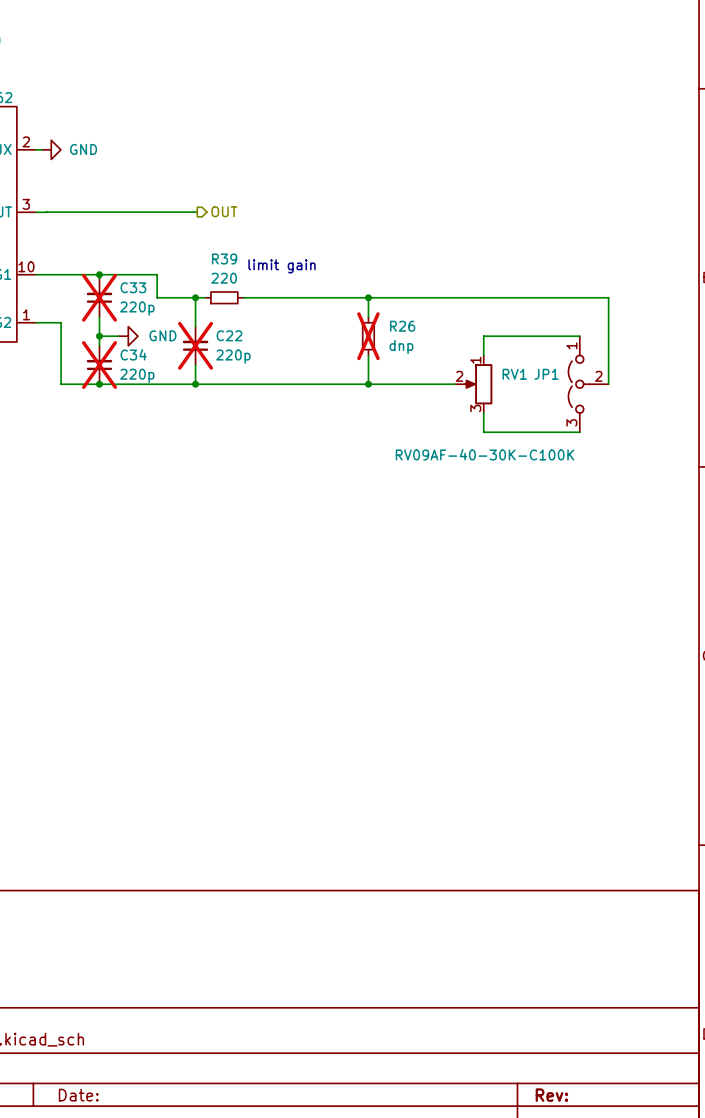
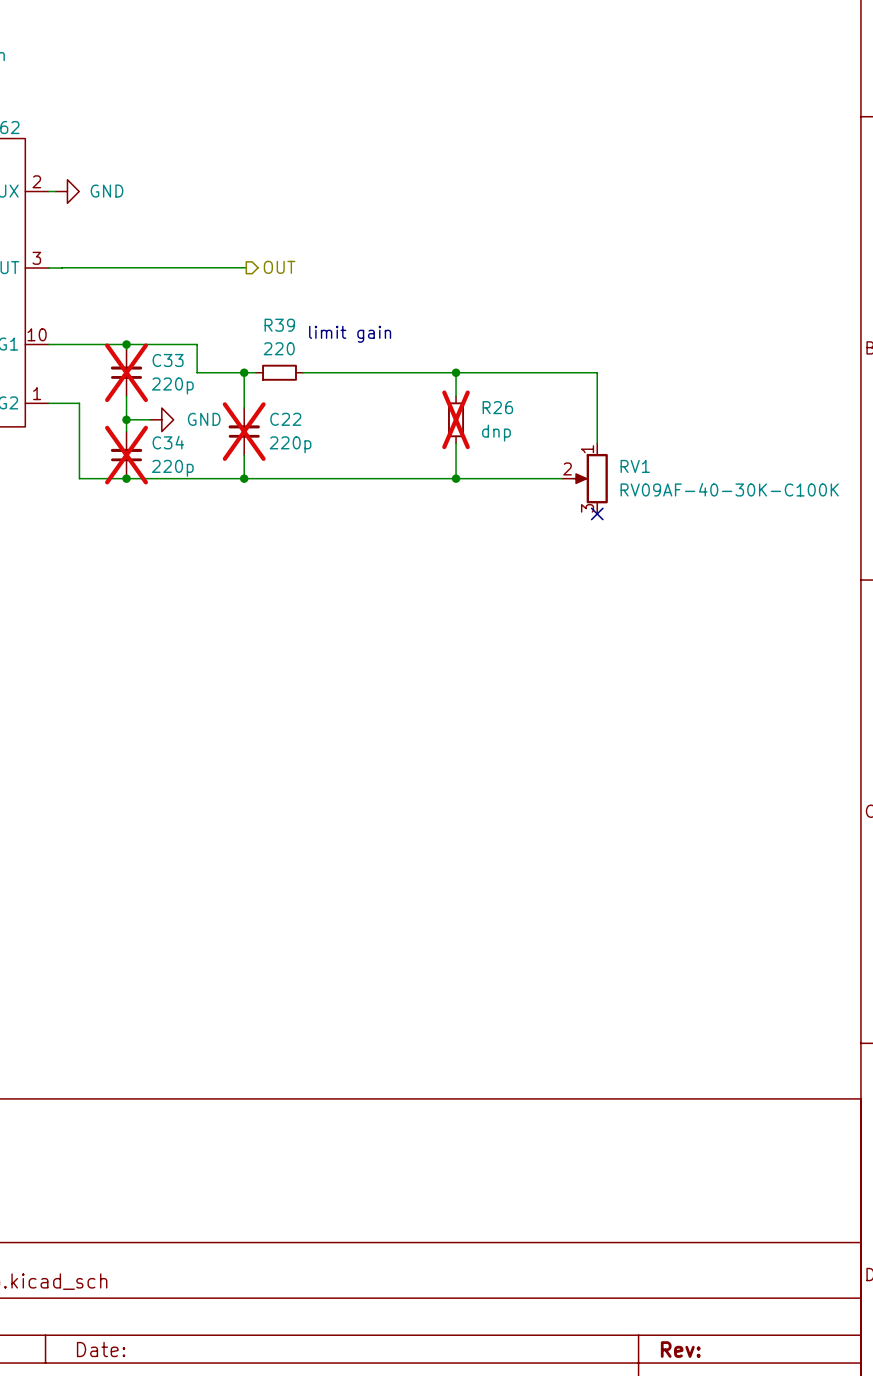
wire: (483, 297) (608, 297) (608, 384) -> none
wire: (483, 336) (579, 336) -> (597, 419) (597, 372)
JP1: (588, 384) -> none
wire: (483, 413) (483, 432) (579, 432) -> none
no-connect mark: none -> (597, 513)
RV1 value position: RV09AF-40-30K-C100K (485, 454) -> RV09AF-40-30K-C100K (729, 489)

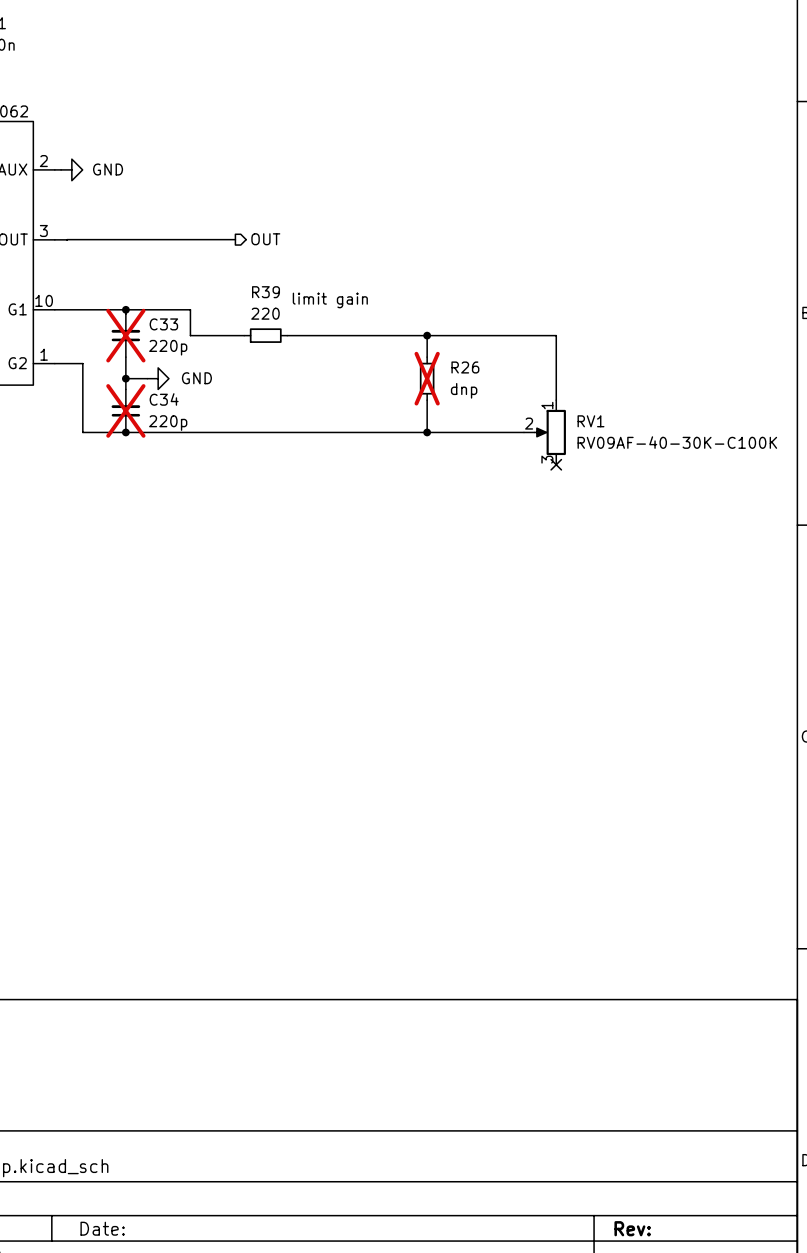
wire: (244, 372) (244, 408) -> none
junction: (244, 372) -> none
C22: 220p (244, 431) -> none
wire: (244, 455) (244, 478) -> none
junction: (244, 478) -> none

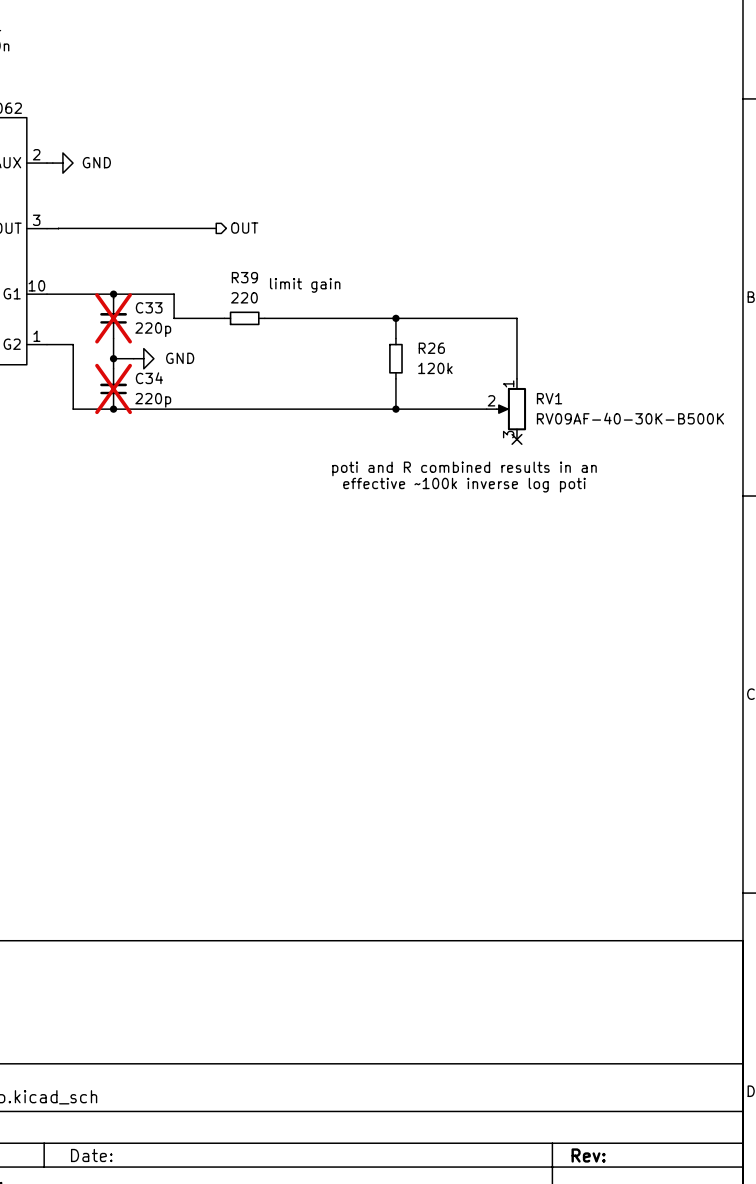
R26 do-not-place cross: (427, 378) -> none
R26 value: dnp (464, 390) -> 120k (435, 368)
RV1 value: RV09AF-40-30K-C100K (677, 442) -> RV09AF-40-30K-B500K (630, 418)
text: none -> poti and R combined results in an (464, 468)
text: none -> effective ~100k inverse log poti (464, 485)

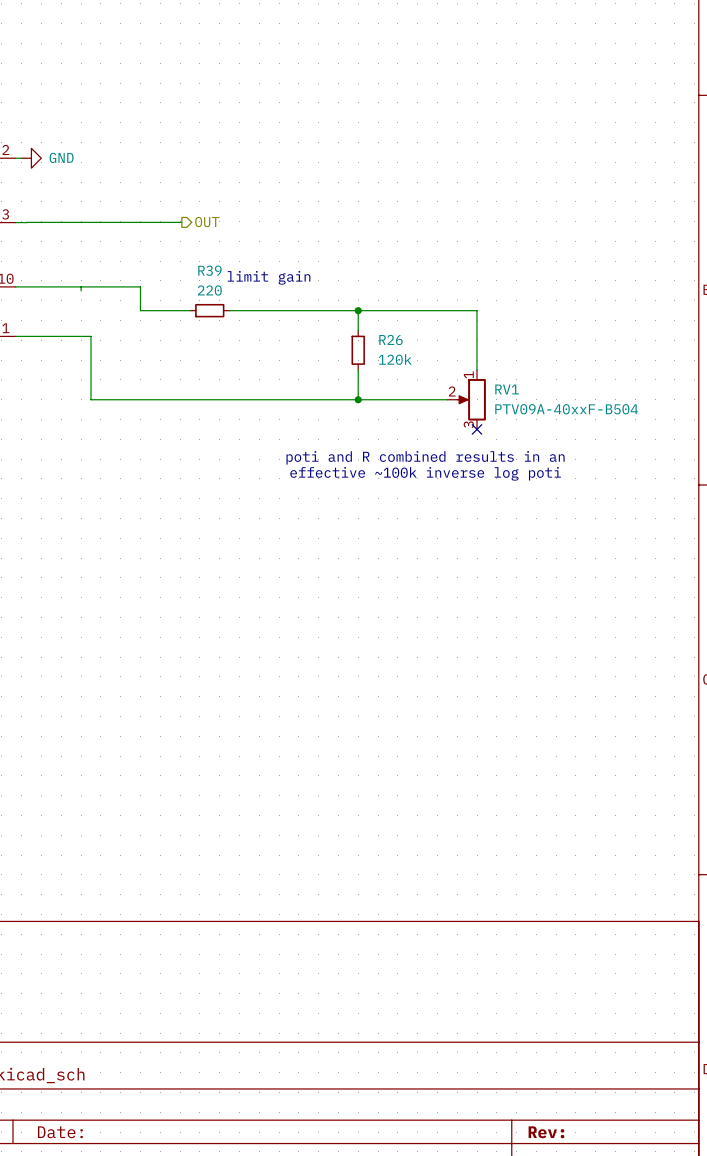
junction: (113, 294) -> none
C33: 220p (113, 318) -> none
wire: (113, 338) (113, 368) -> none
wire: (73, 344) (73, 409) (123, 409) -> (41, 336) (90, 336) (90, 399)
wire: (113, 358) (133, 358) -> none
junction: (113, 358) -> none
power symbol: GND (143, 358) -> none
C34: 220p (113, 388) -> none
junction: (113, 409) -> none
RV1 value: RV09AF-40-30K-B500K (630, 418) -> PTV09A-40xxF-B504 (566, 409)

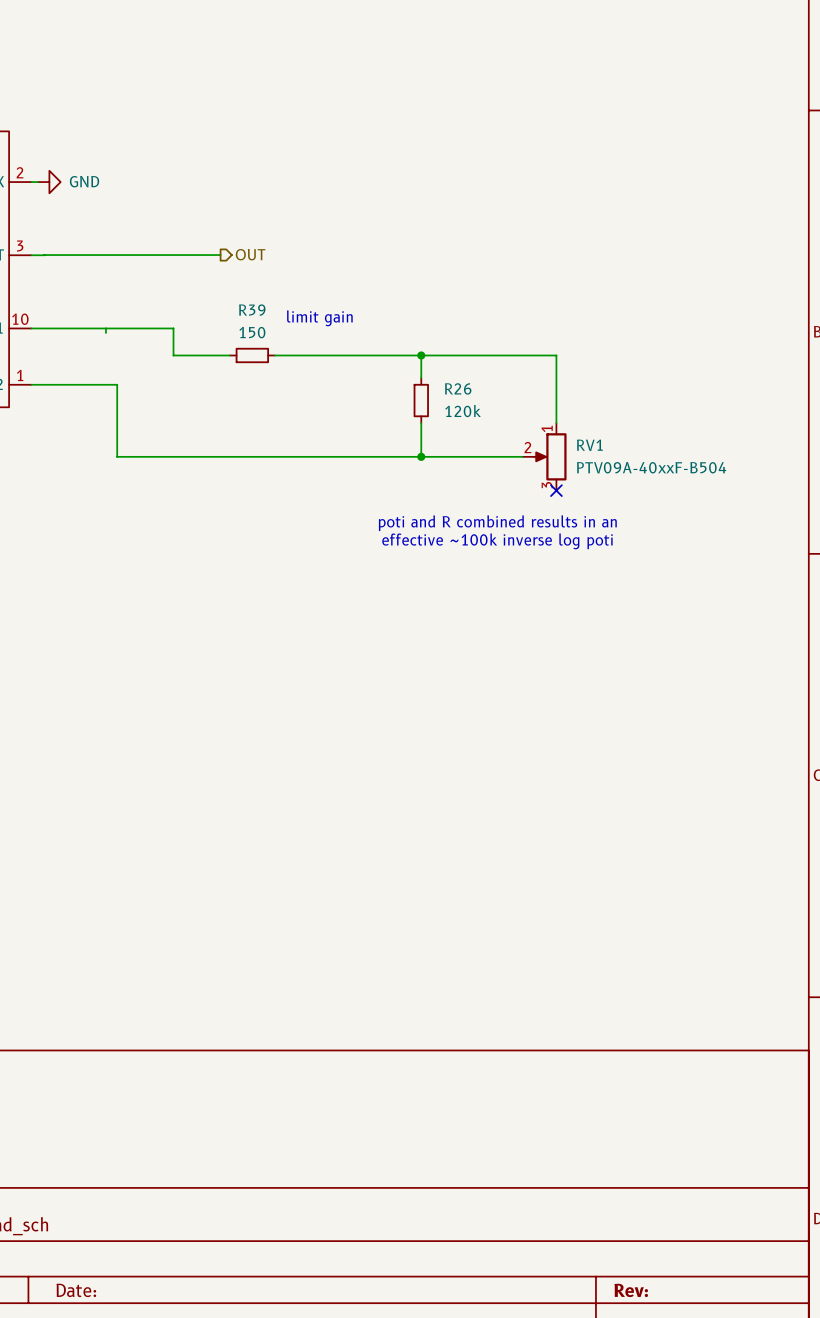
R39 value: 220 (209, 290) -> 150 (252, 332)

